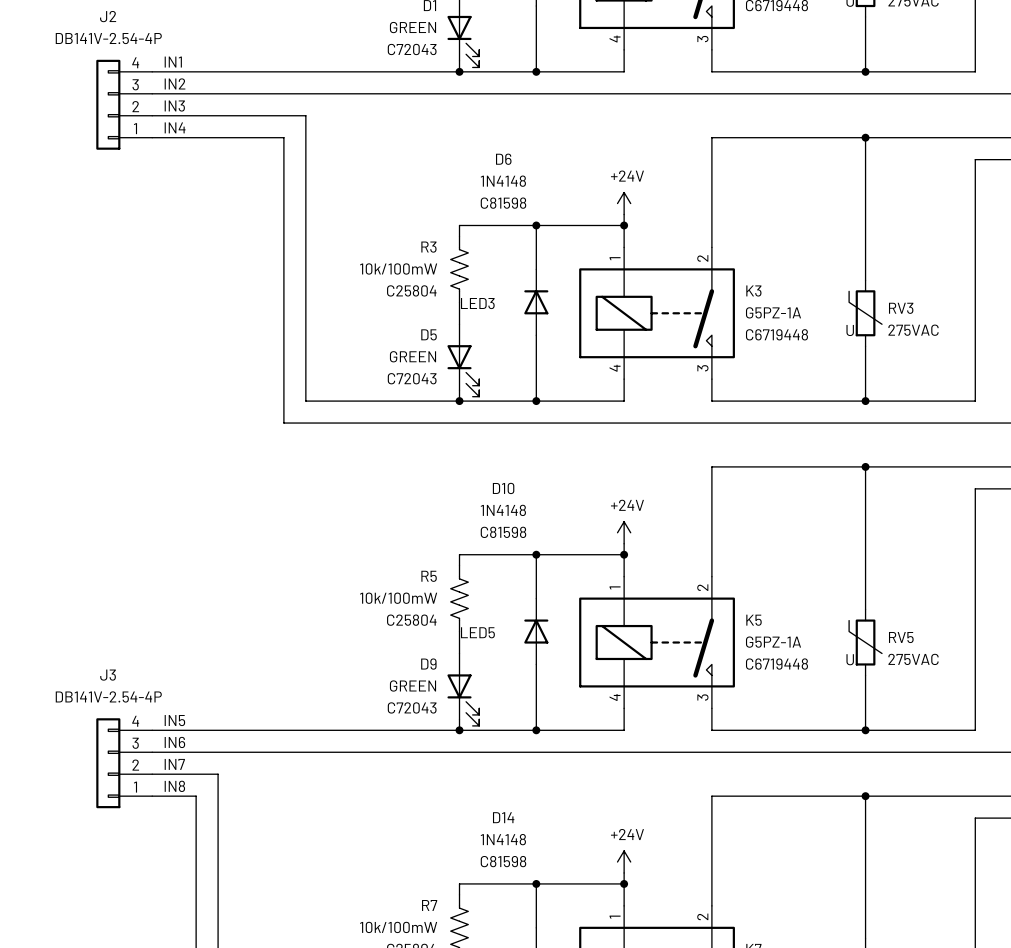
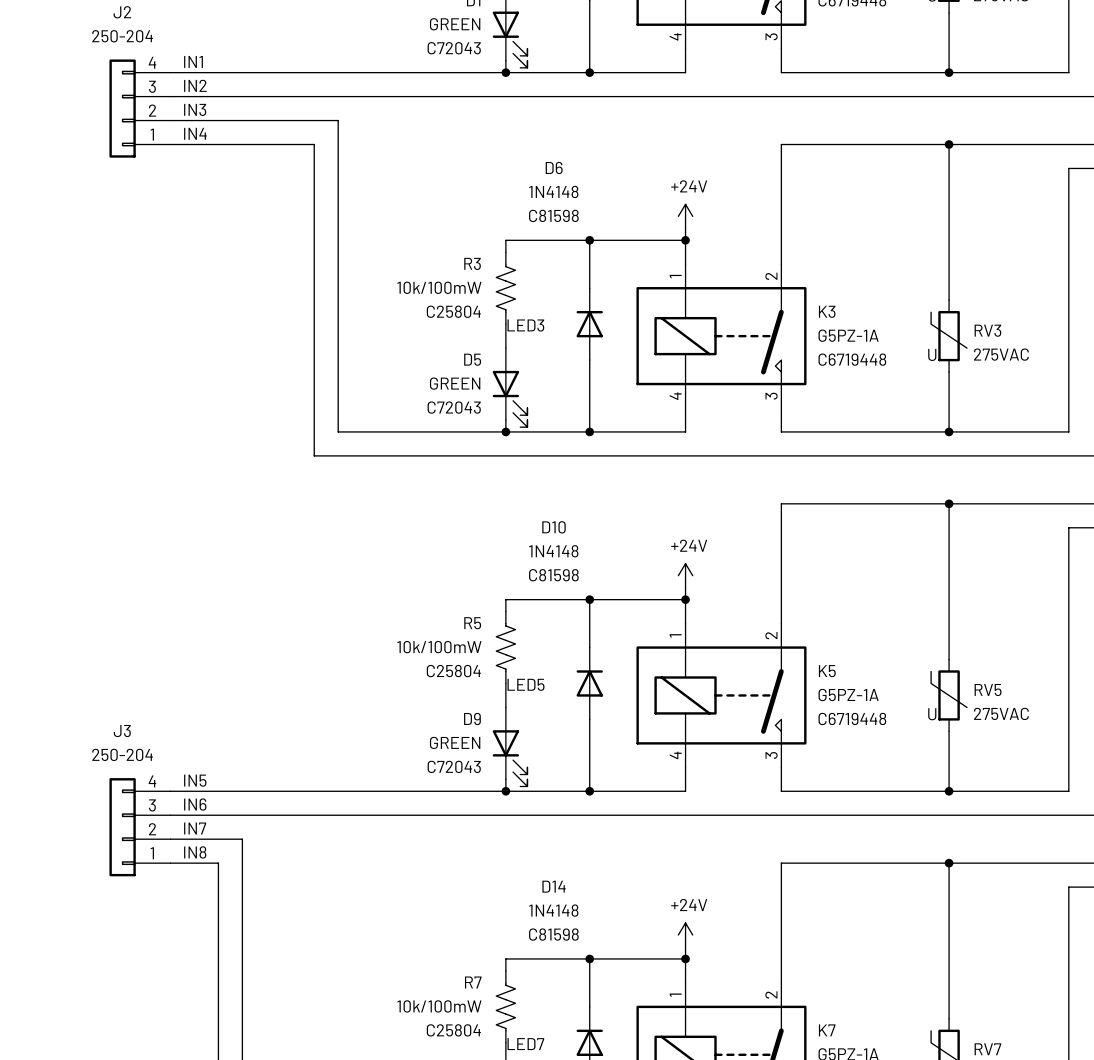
J2 value: DB141V-2.54-4P (108, 38) -> 250-204 (122, 36)
J3 value: DB141V-2.54-4P (108, 696) -> 250-204 (122, 754)

